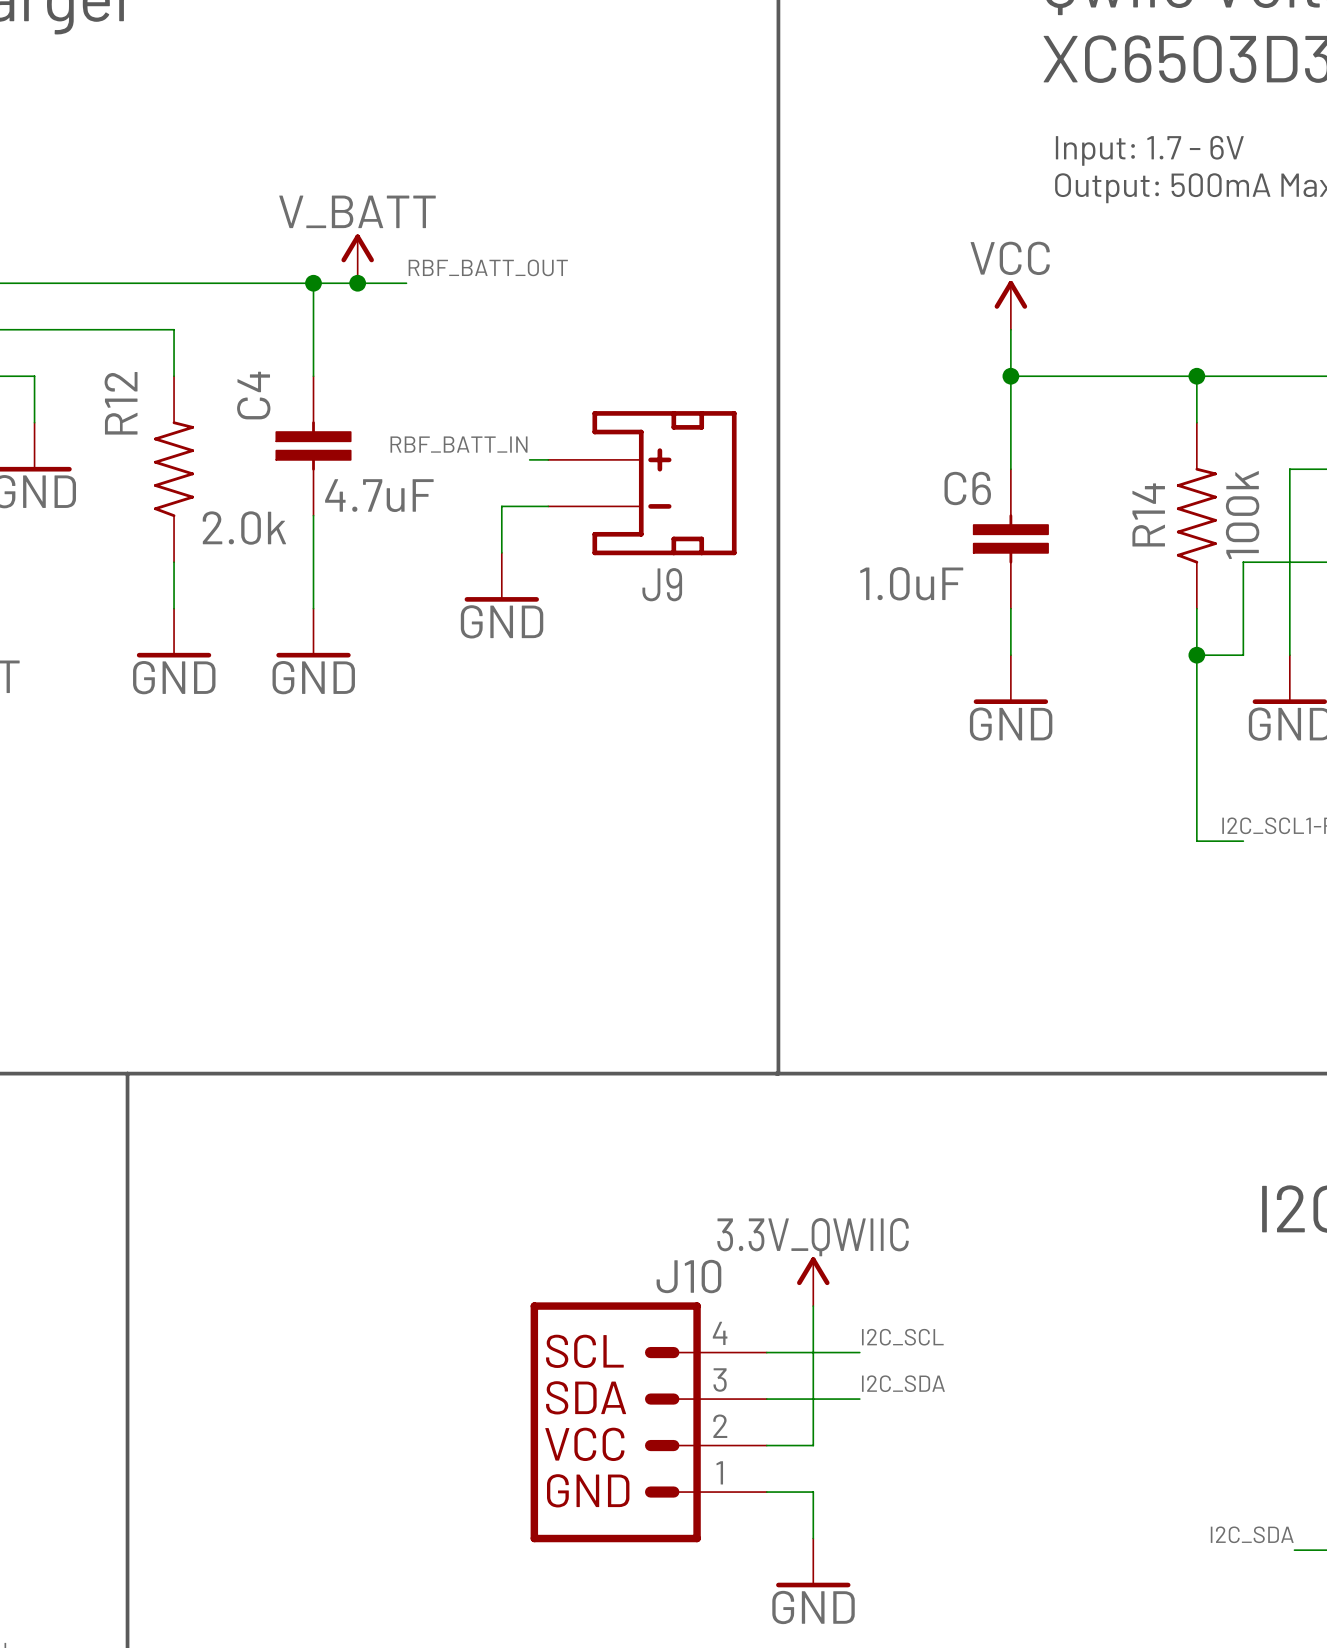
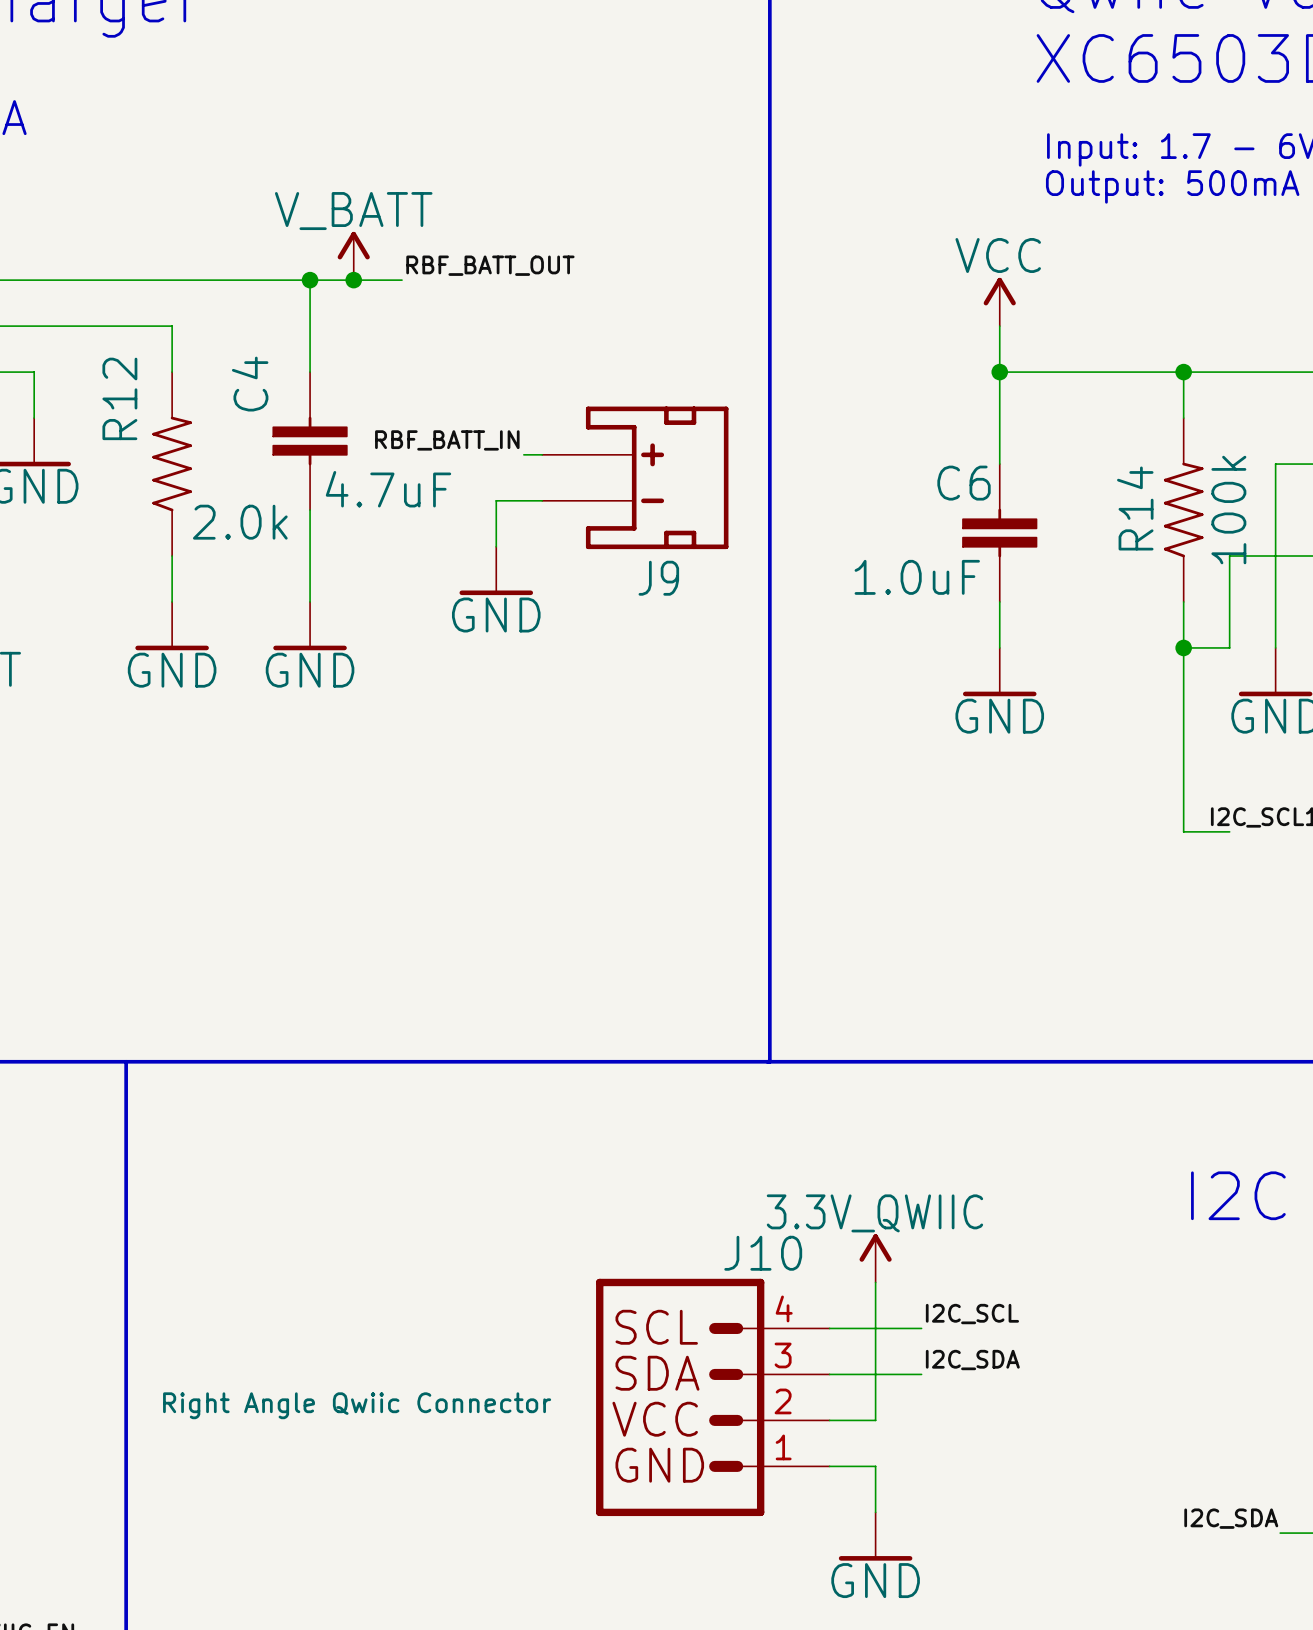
power symbol position: 3.3V_QWIIC (813, 1281) -> 3.3V_QWIIC (875, 1258)
wire: (813, 1306) (813, 1445) (766, 1445) -> (875, 1282) (875, 1420) (829, 1420)
label position: I2C_SCL (902, 1337) -> I2C_SCL (972, 1314)
wire: (766, 1352) (859, 1352) -> (829, 1328) (921, 1328)
label position: I2C_SDA (903, 1383) -> I2C_SDA (972, 1360)
wire: (766, 1399) (859, 1399) -> (829, 1374) (921, 1374)
J10 value: none -> Right Angle Qwiic Connector (357, 1405)
J10 position: (648, 1422) -> (712, 1397)
wire: (766, 1492) (813, 1492) (813, 1538) -> (829, 1466) (875, 1466) (875, 1512)
power symbol position: GND (813, 1562) -> GND (875, 1536)

